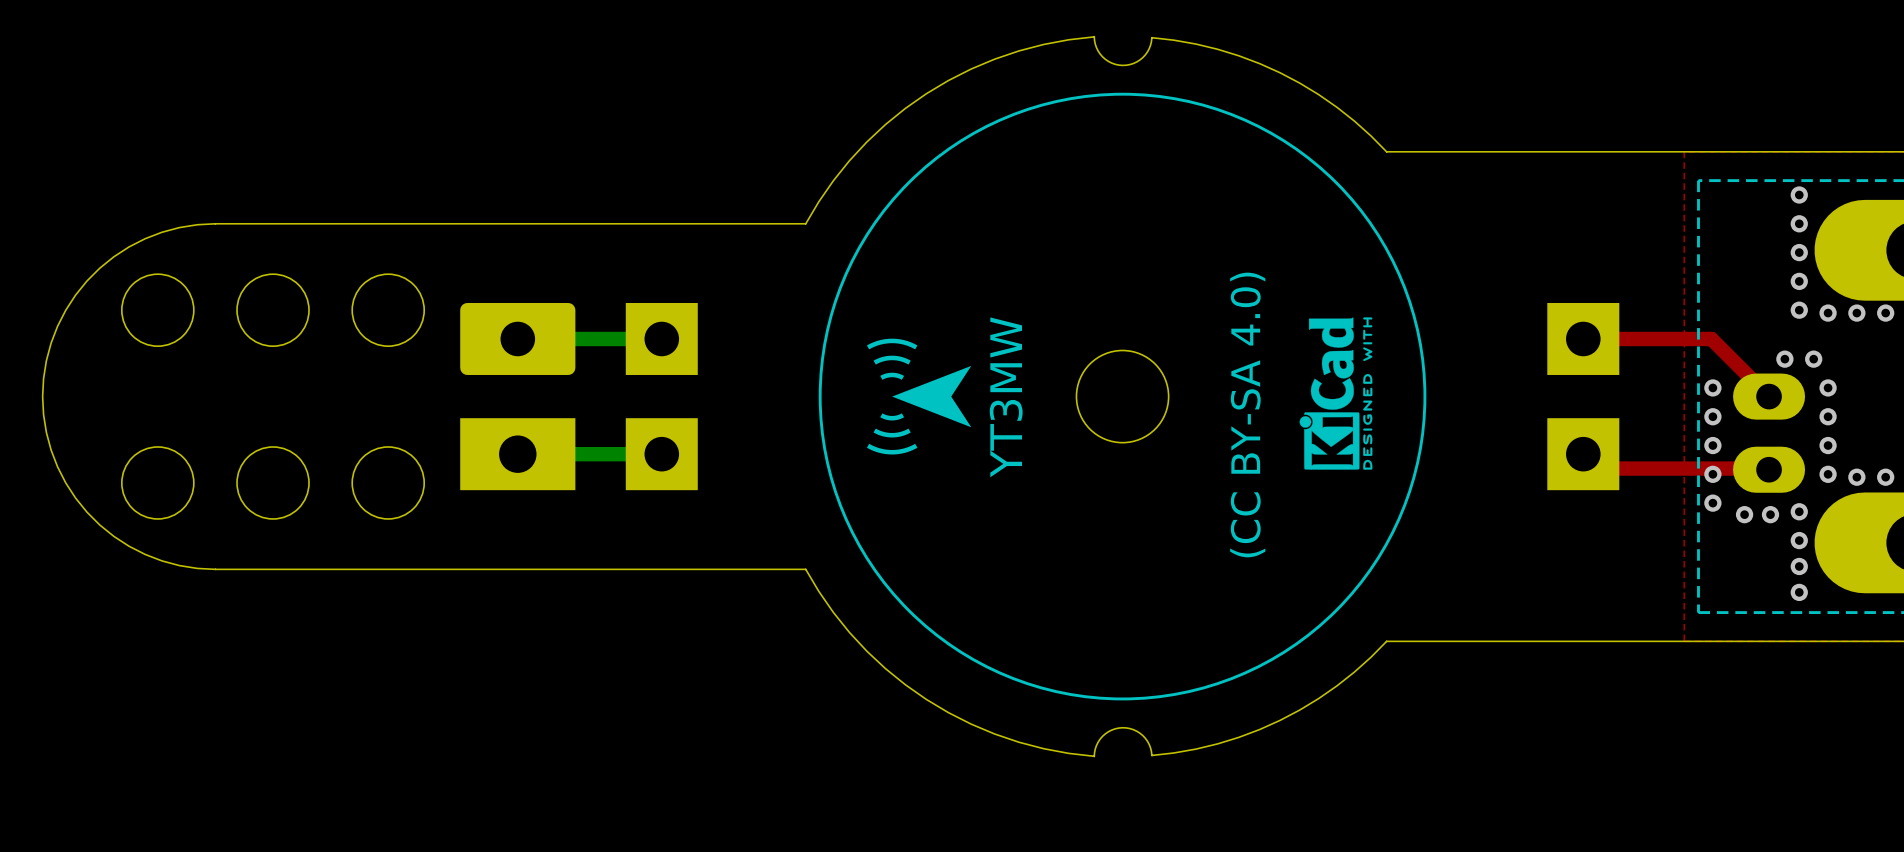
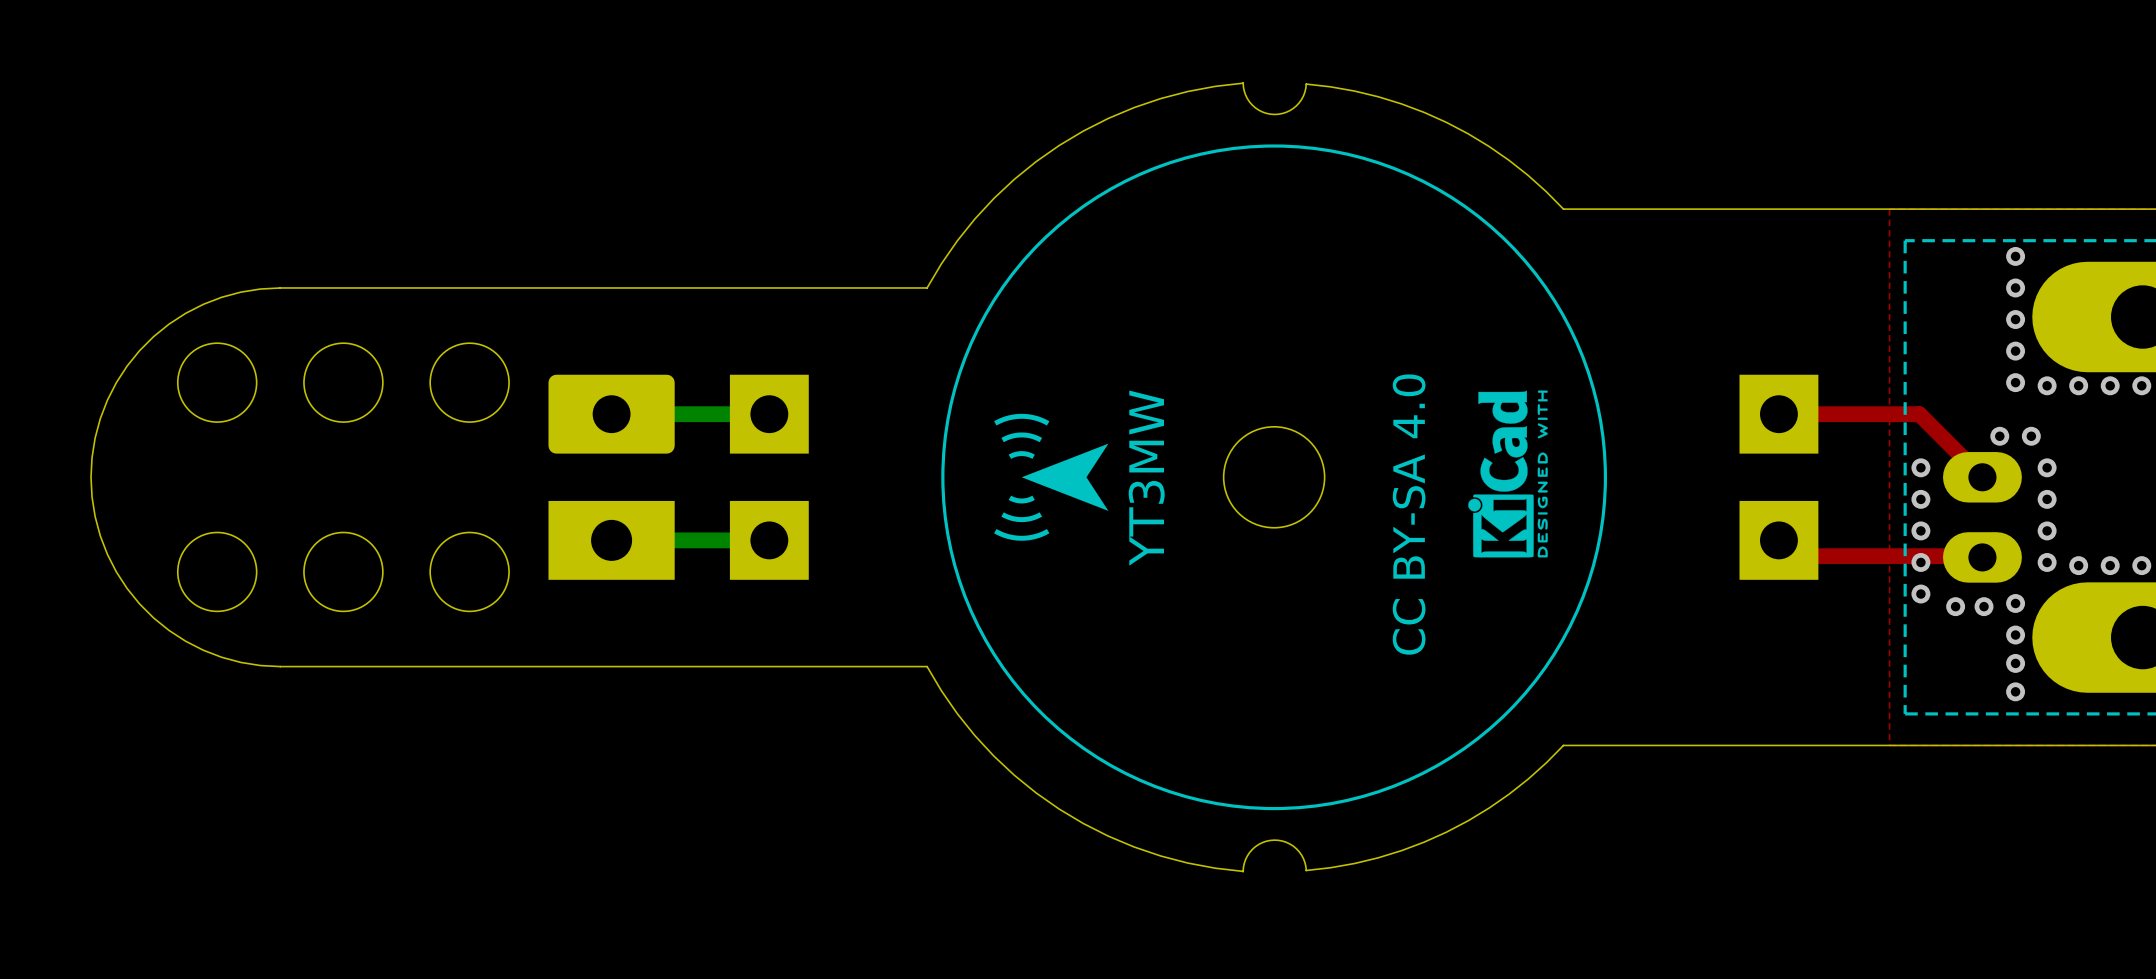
text: (CC BY-SA 4.0) (1247, 414) -> CC BY-SA 4.0 (1409, 514)

